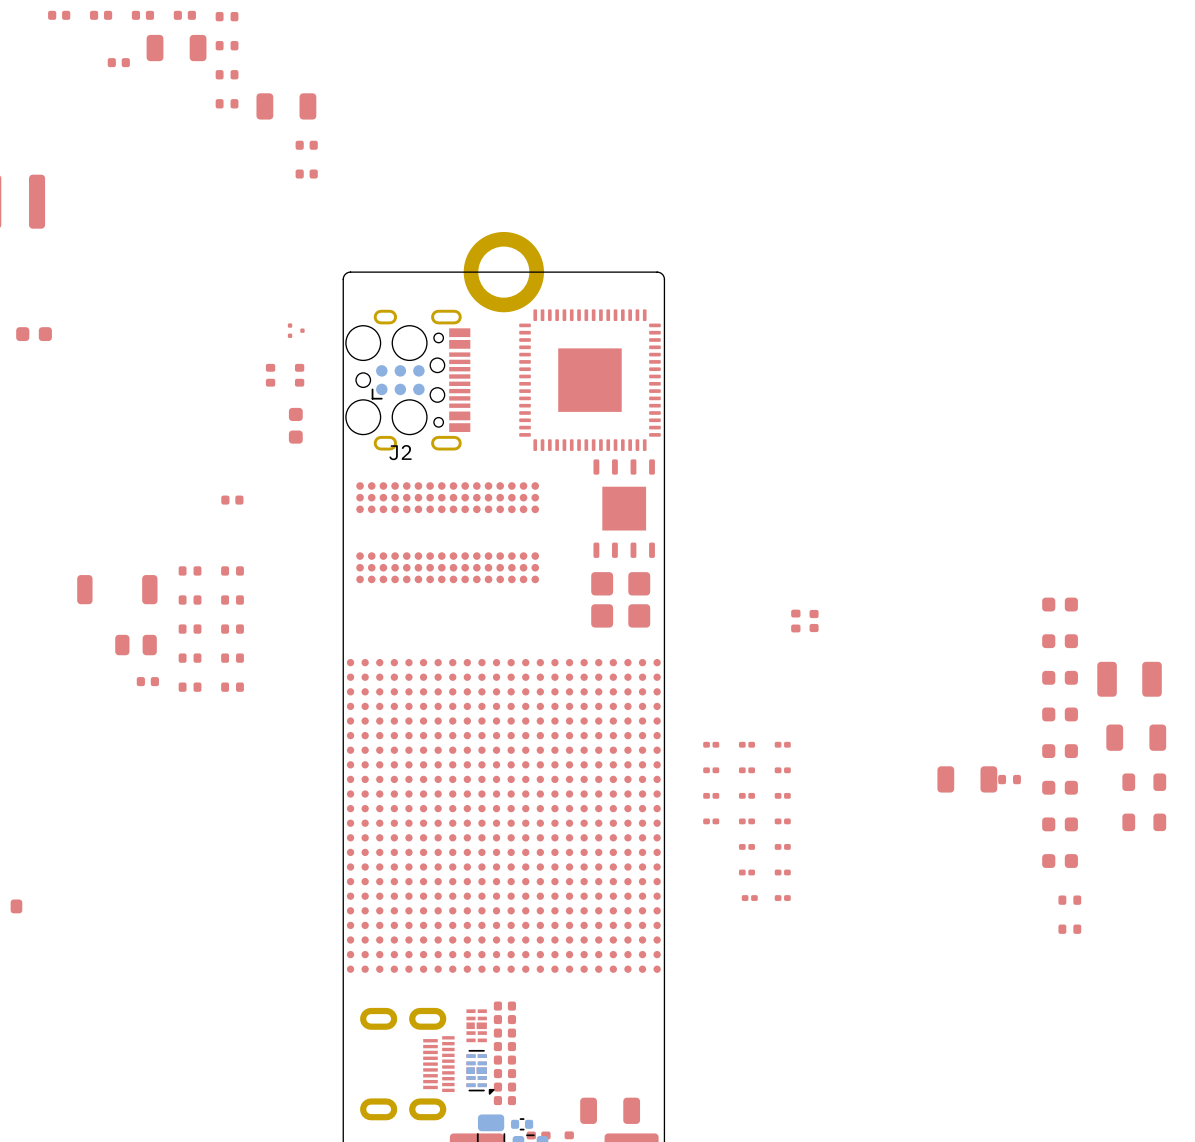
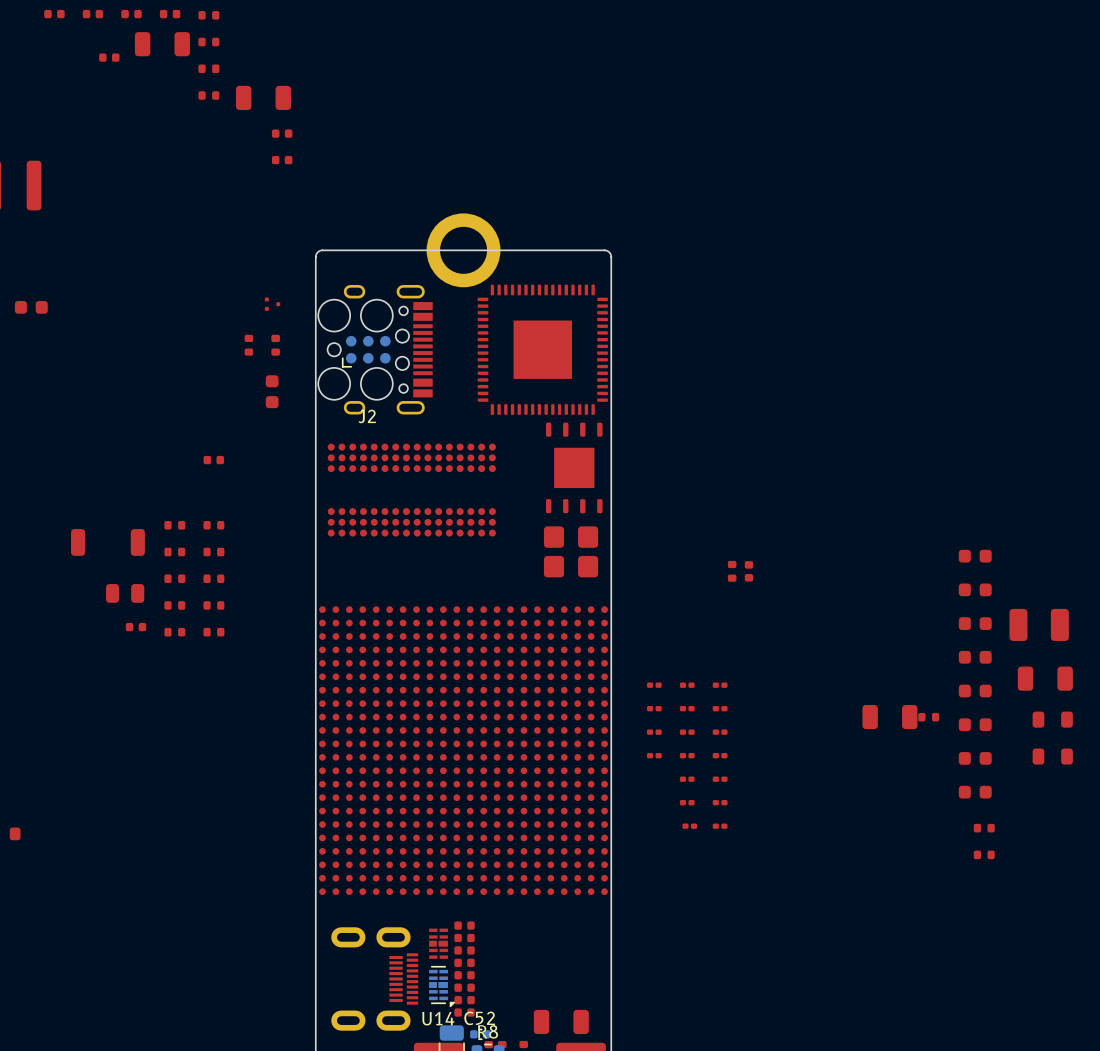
C52 name: none -> C52 (479, 1018)
U14 name: none -> U14 (438, 1018)
R8 name: none -> R8 (487, 1031)

